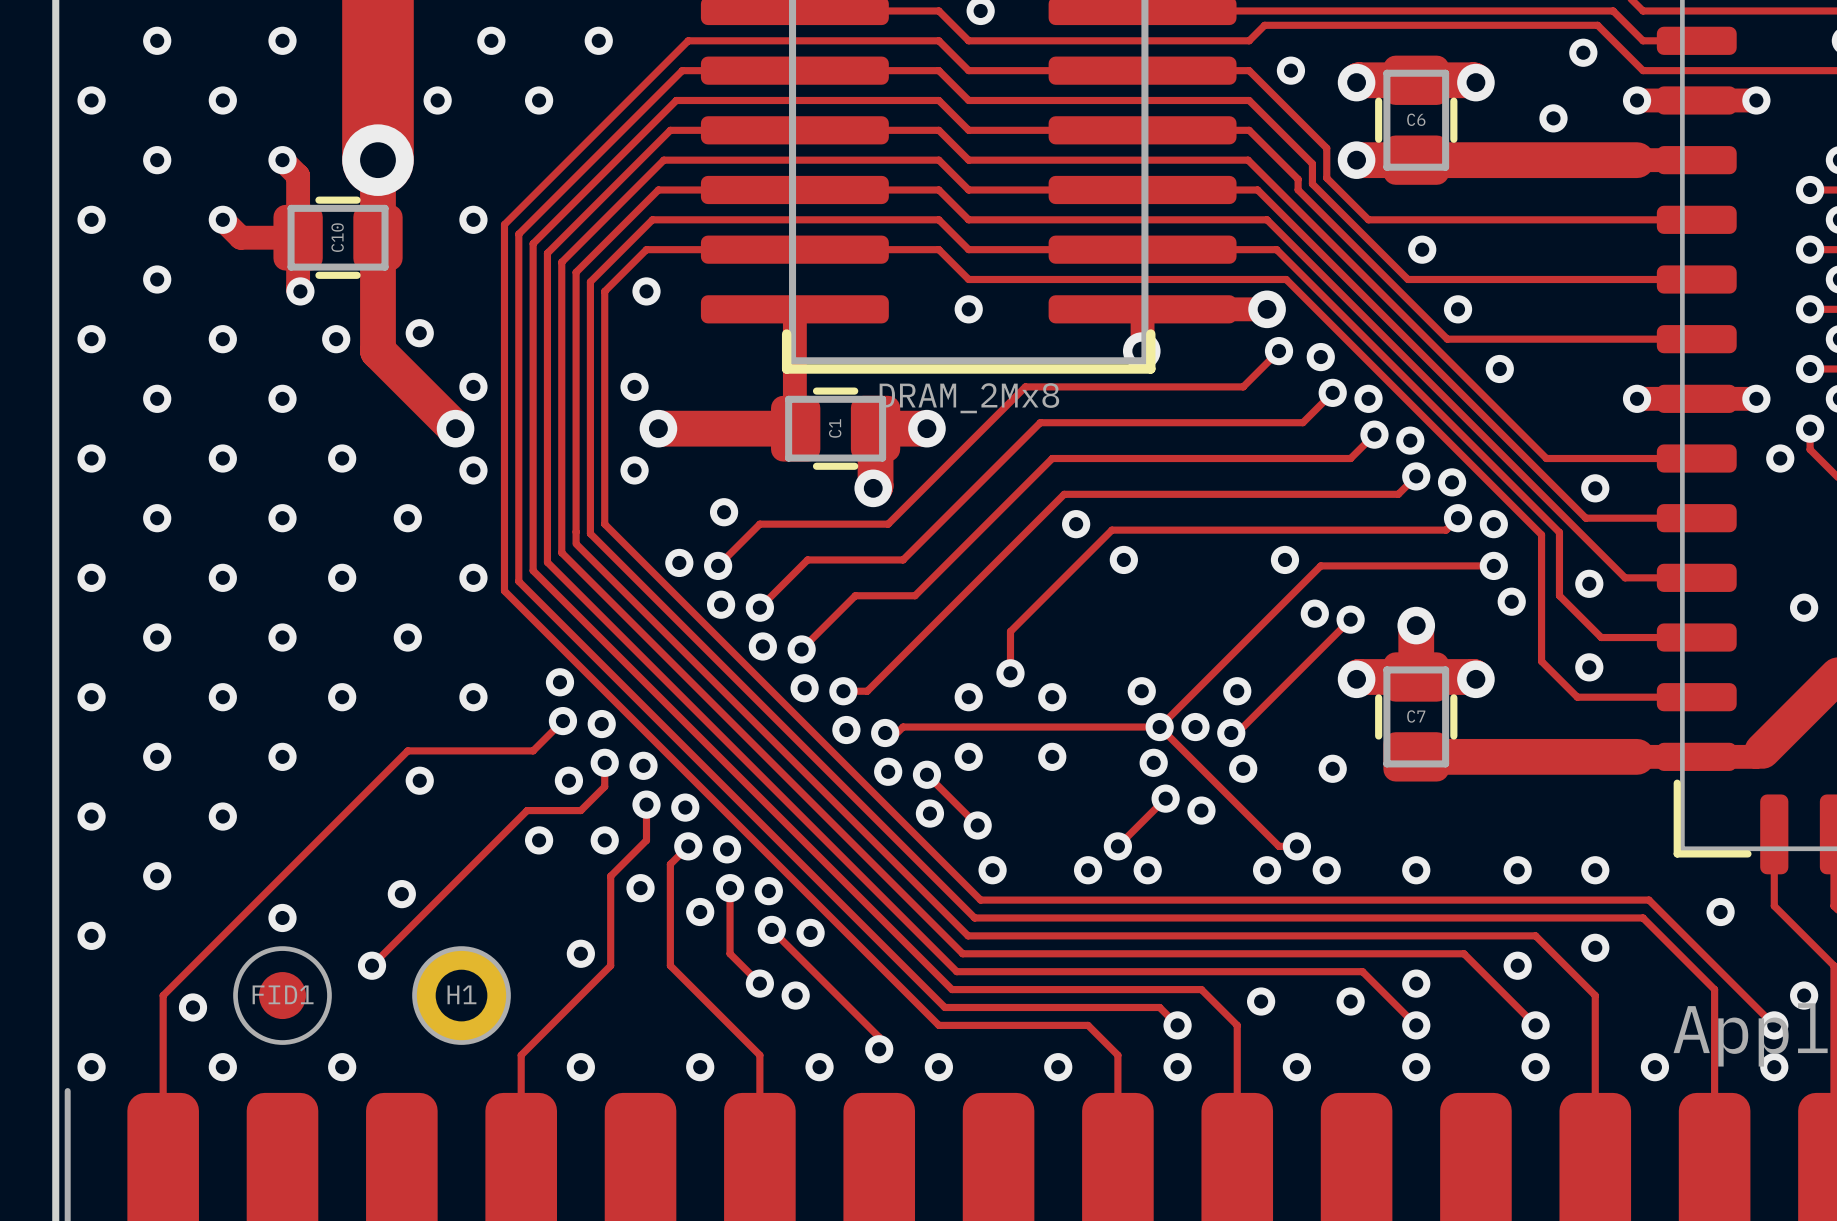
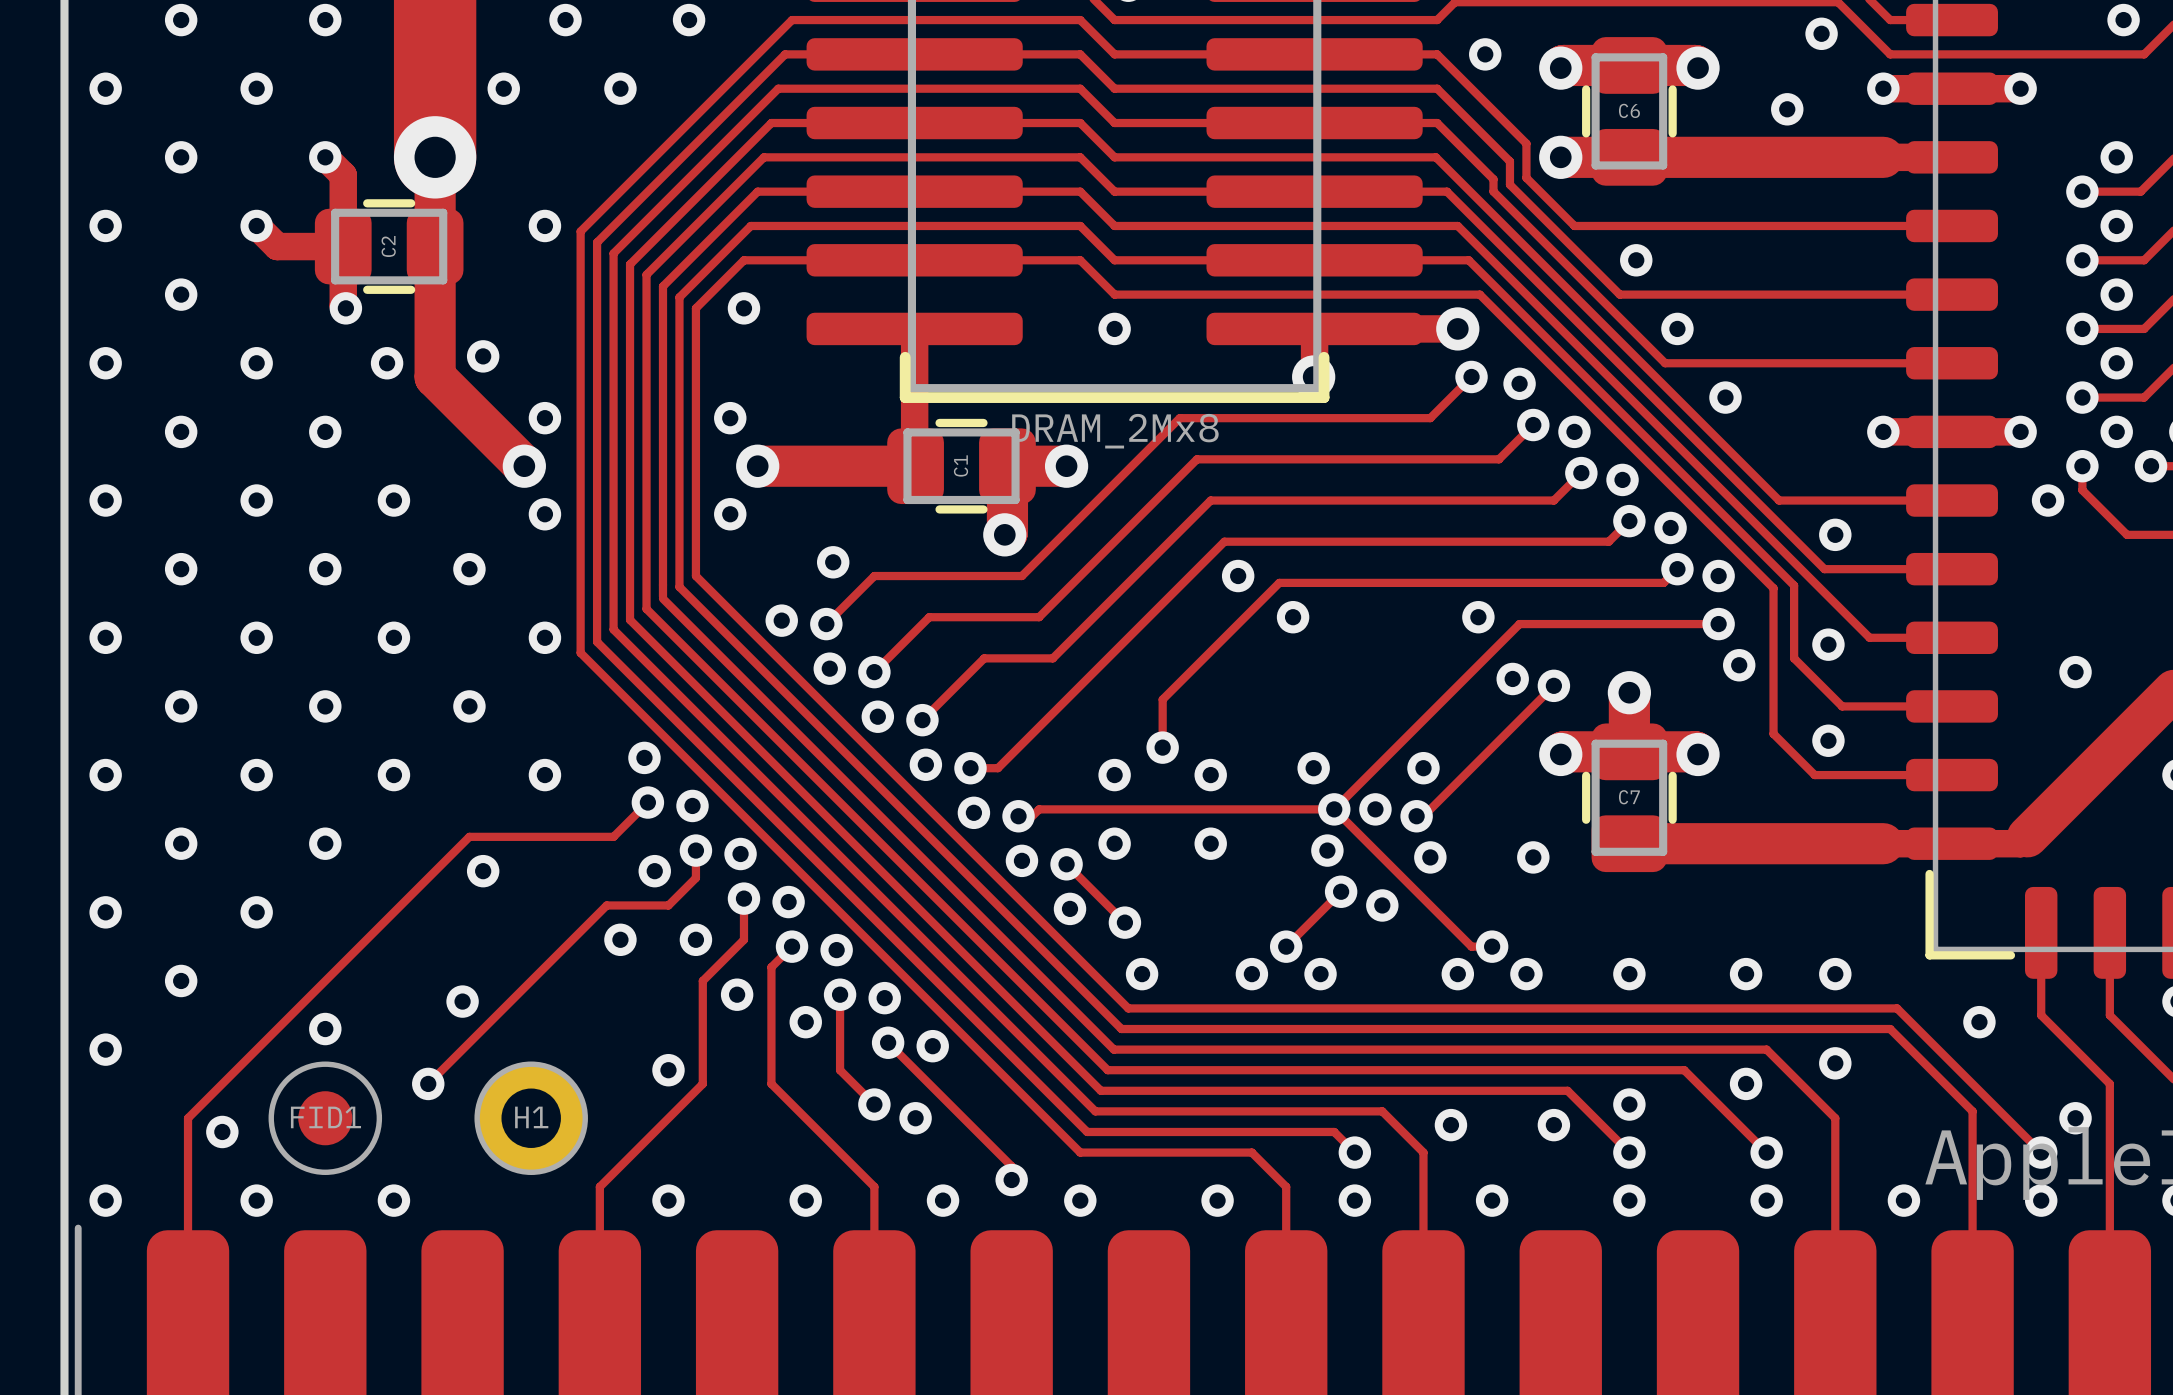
C10 name: C10 (337, 237) -> C2 (388, 246)

